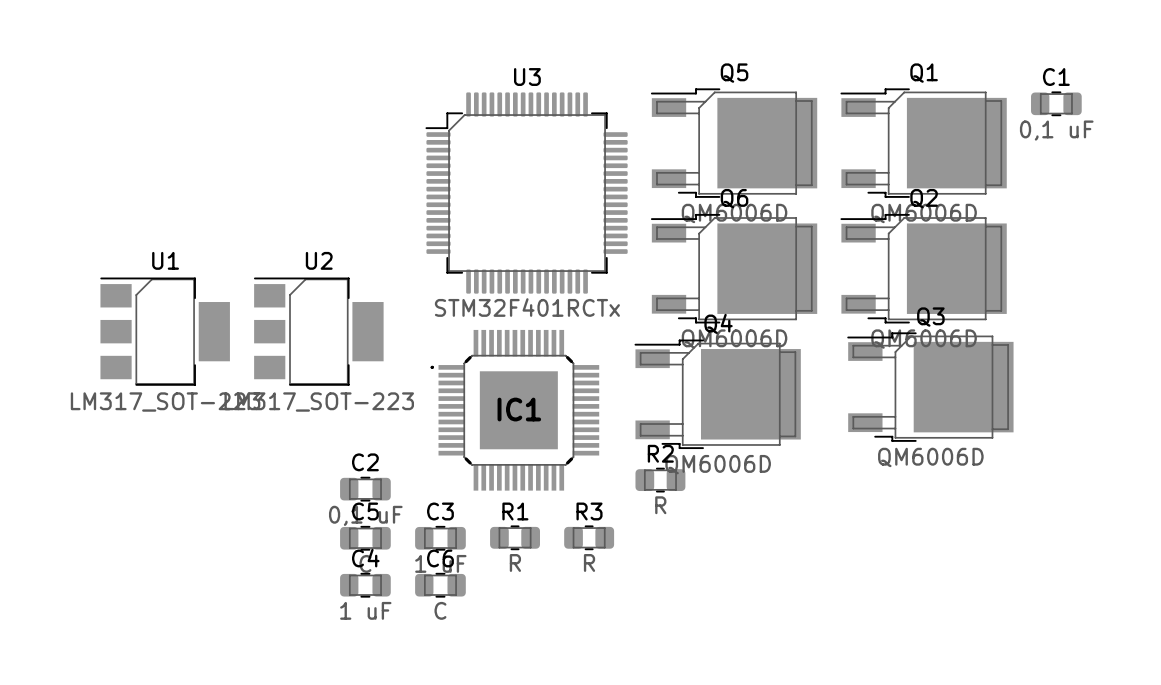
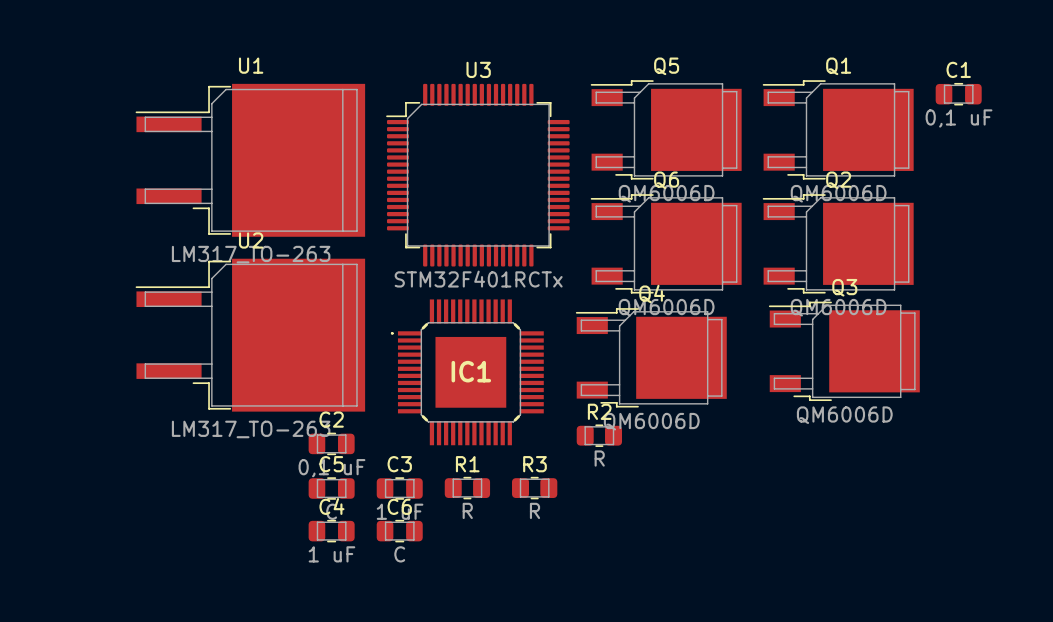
U1 name position: U1 (165, 260) -> U1 (251, 65)
U2 name position: U2 (319, 260) -> U2 (251, 240)
U1 footprint: [100, 277, 230, 386] -> [135, 83, 366, 237]
U2 footprint: [253, 277, 384, 386] -> [135, 258, 366, 412]
U1 value: LM317_SOT-223 (165, 402) -> LM317_TO-263 (251, 254)
U2 value: LM317_SOT-223 (319, 402) -> LM317_TO-263 (251, 429)

